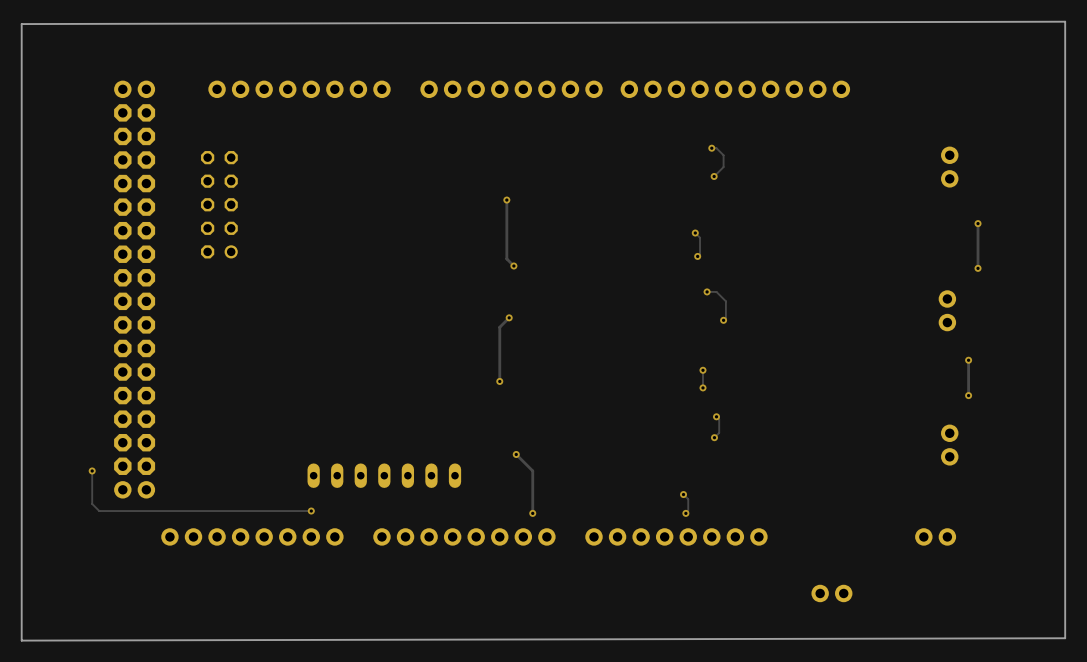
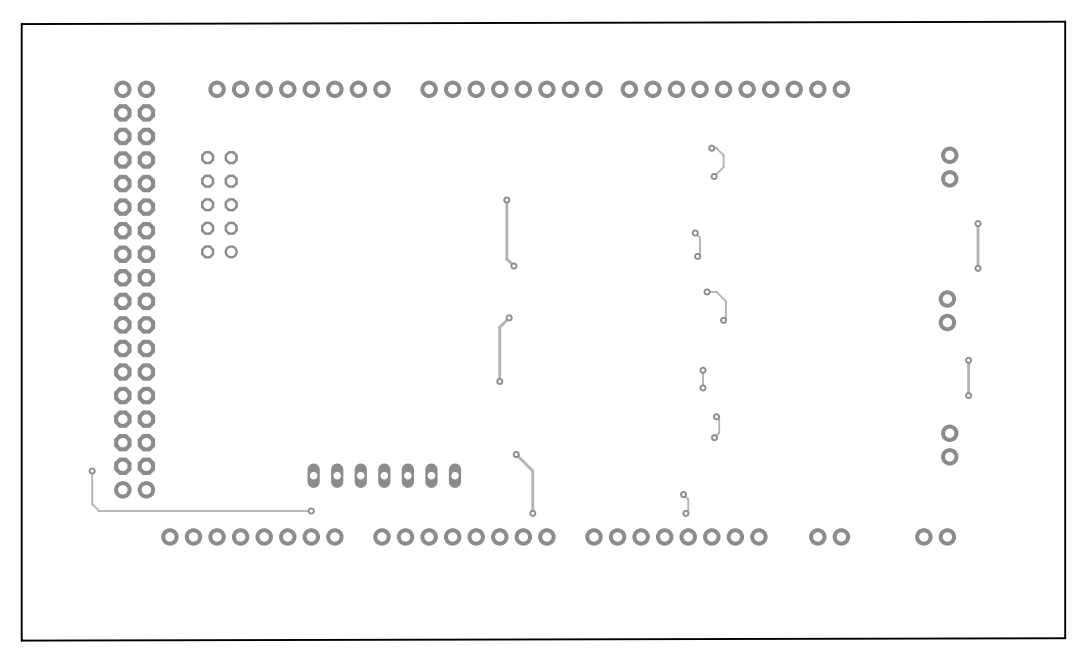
part position: (831, 593) -> (829, 536)

